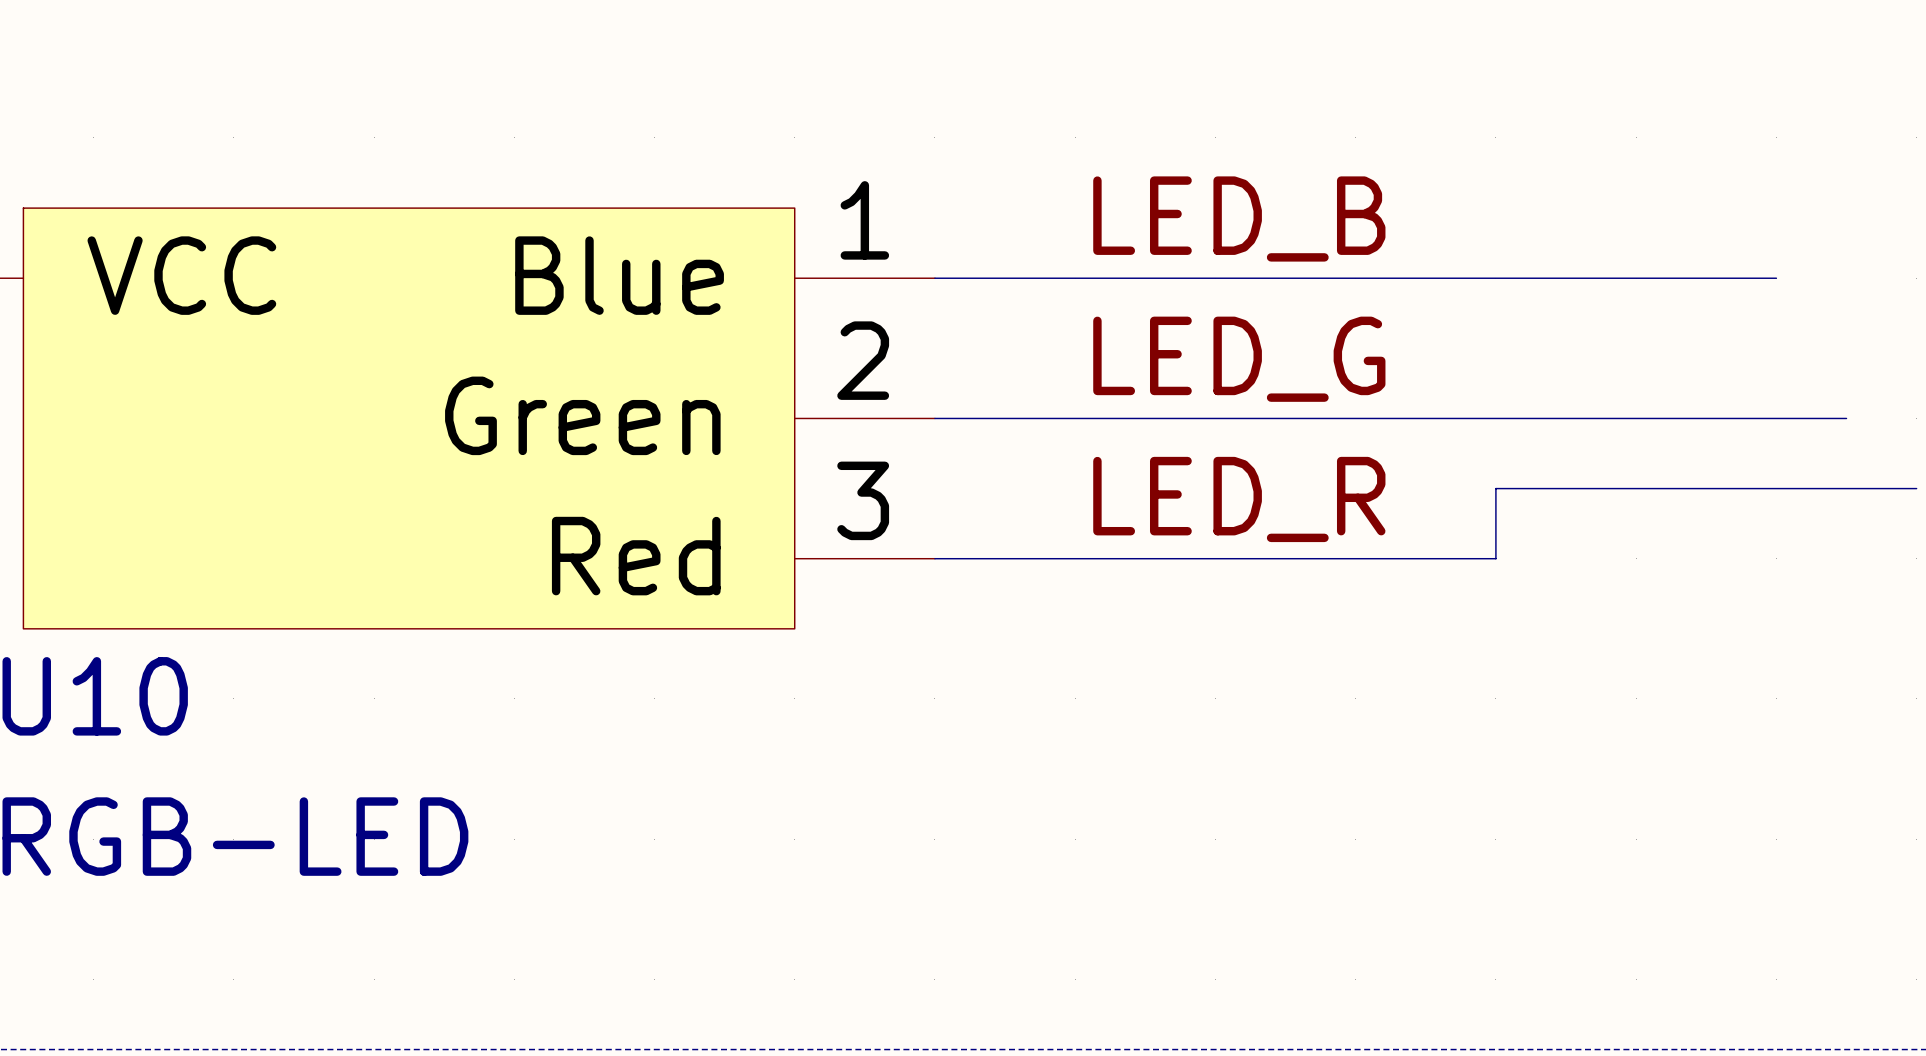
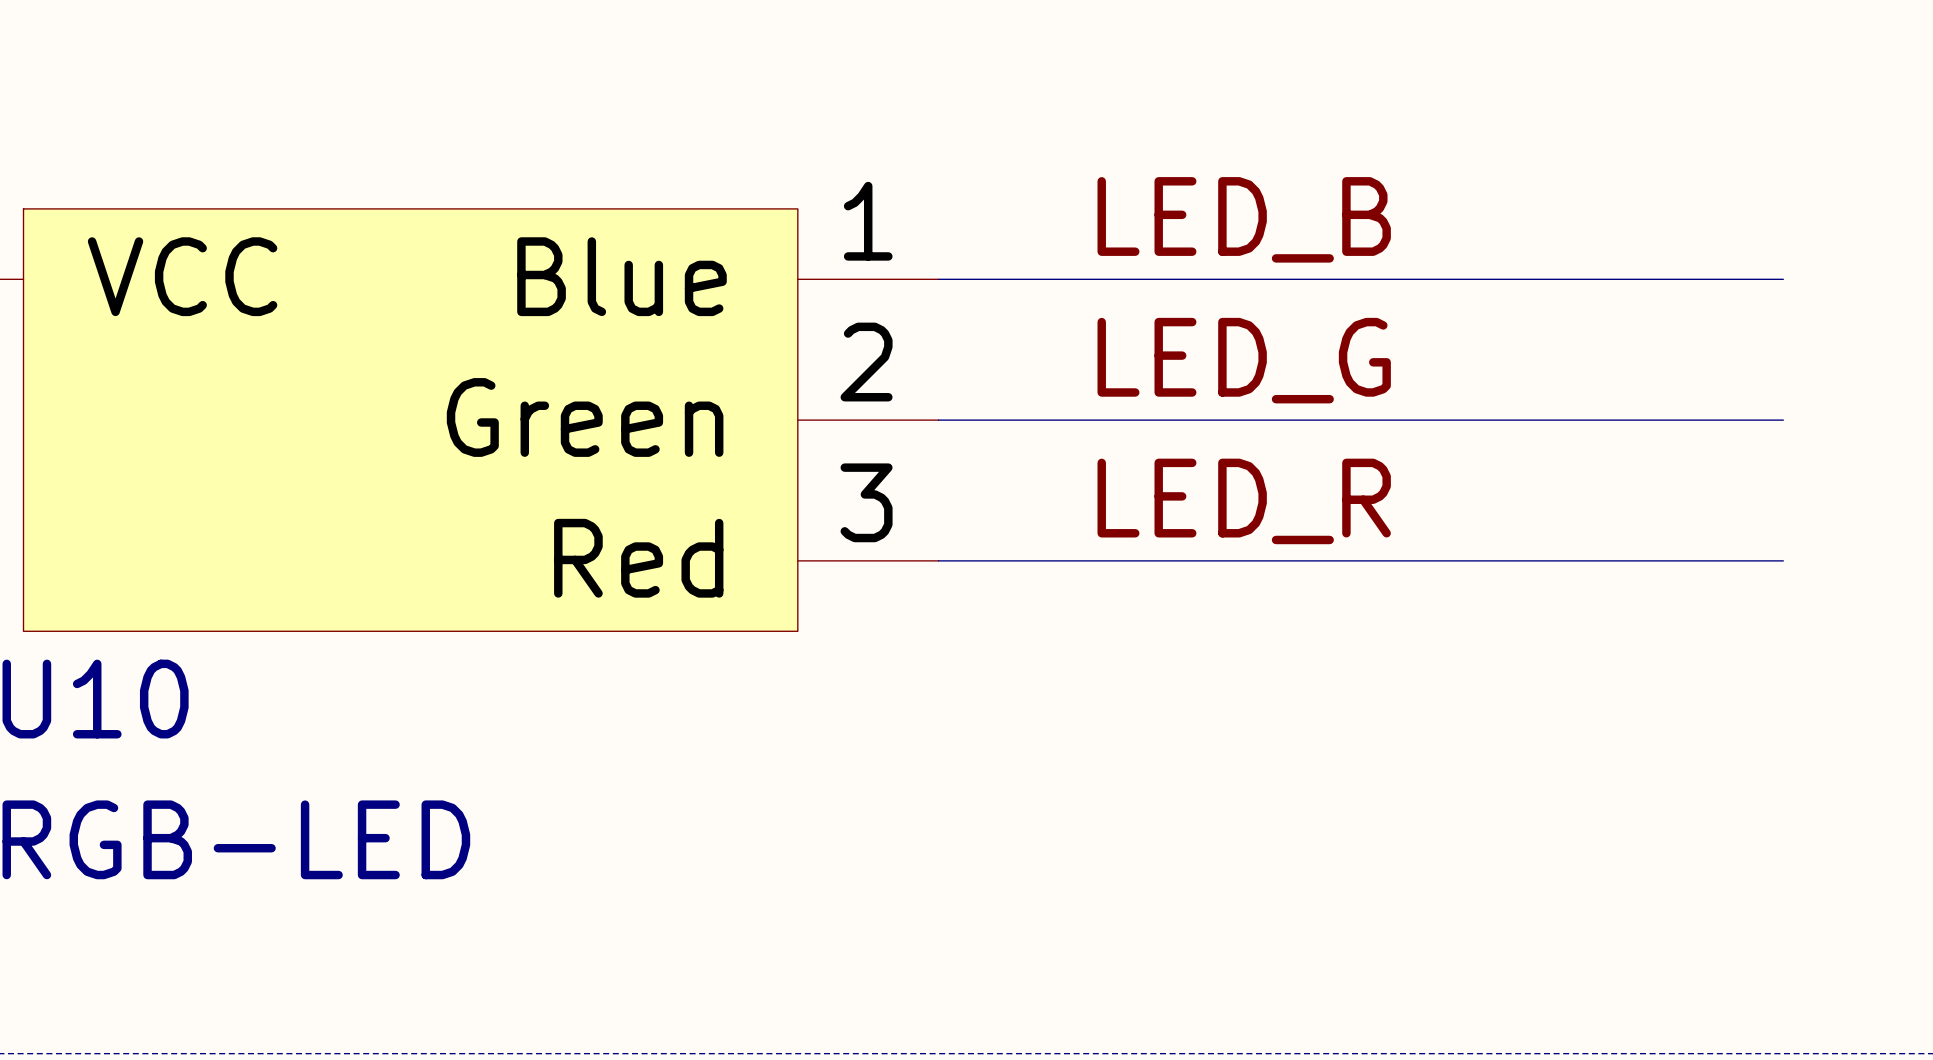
wire: (1776, 418) (1846, 418) -> none
wire: (1916, 488) (1495, 488) (1495, 558) -> (1783, 560) (1501, 560)

